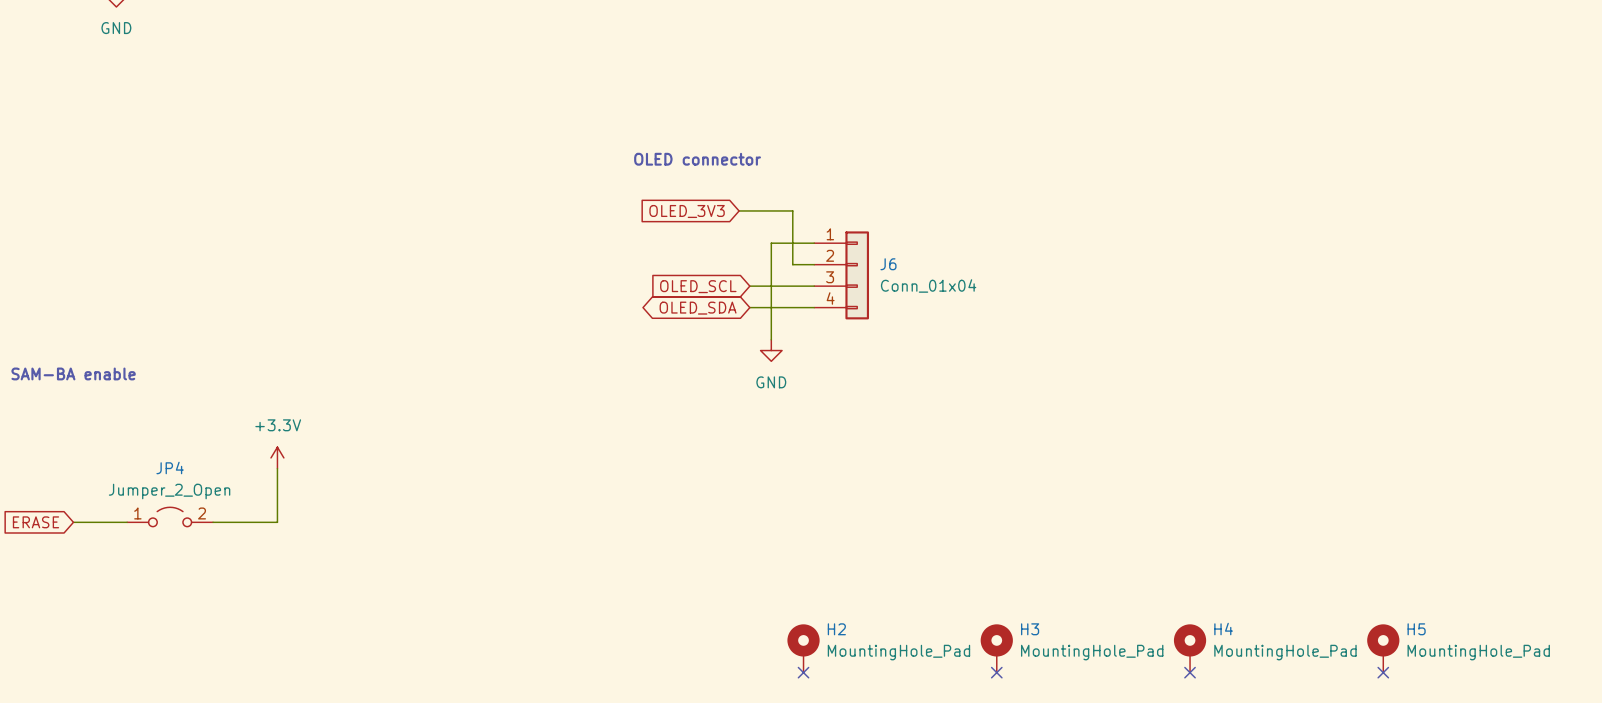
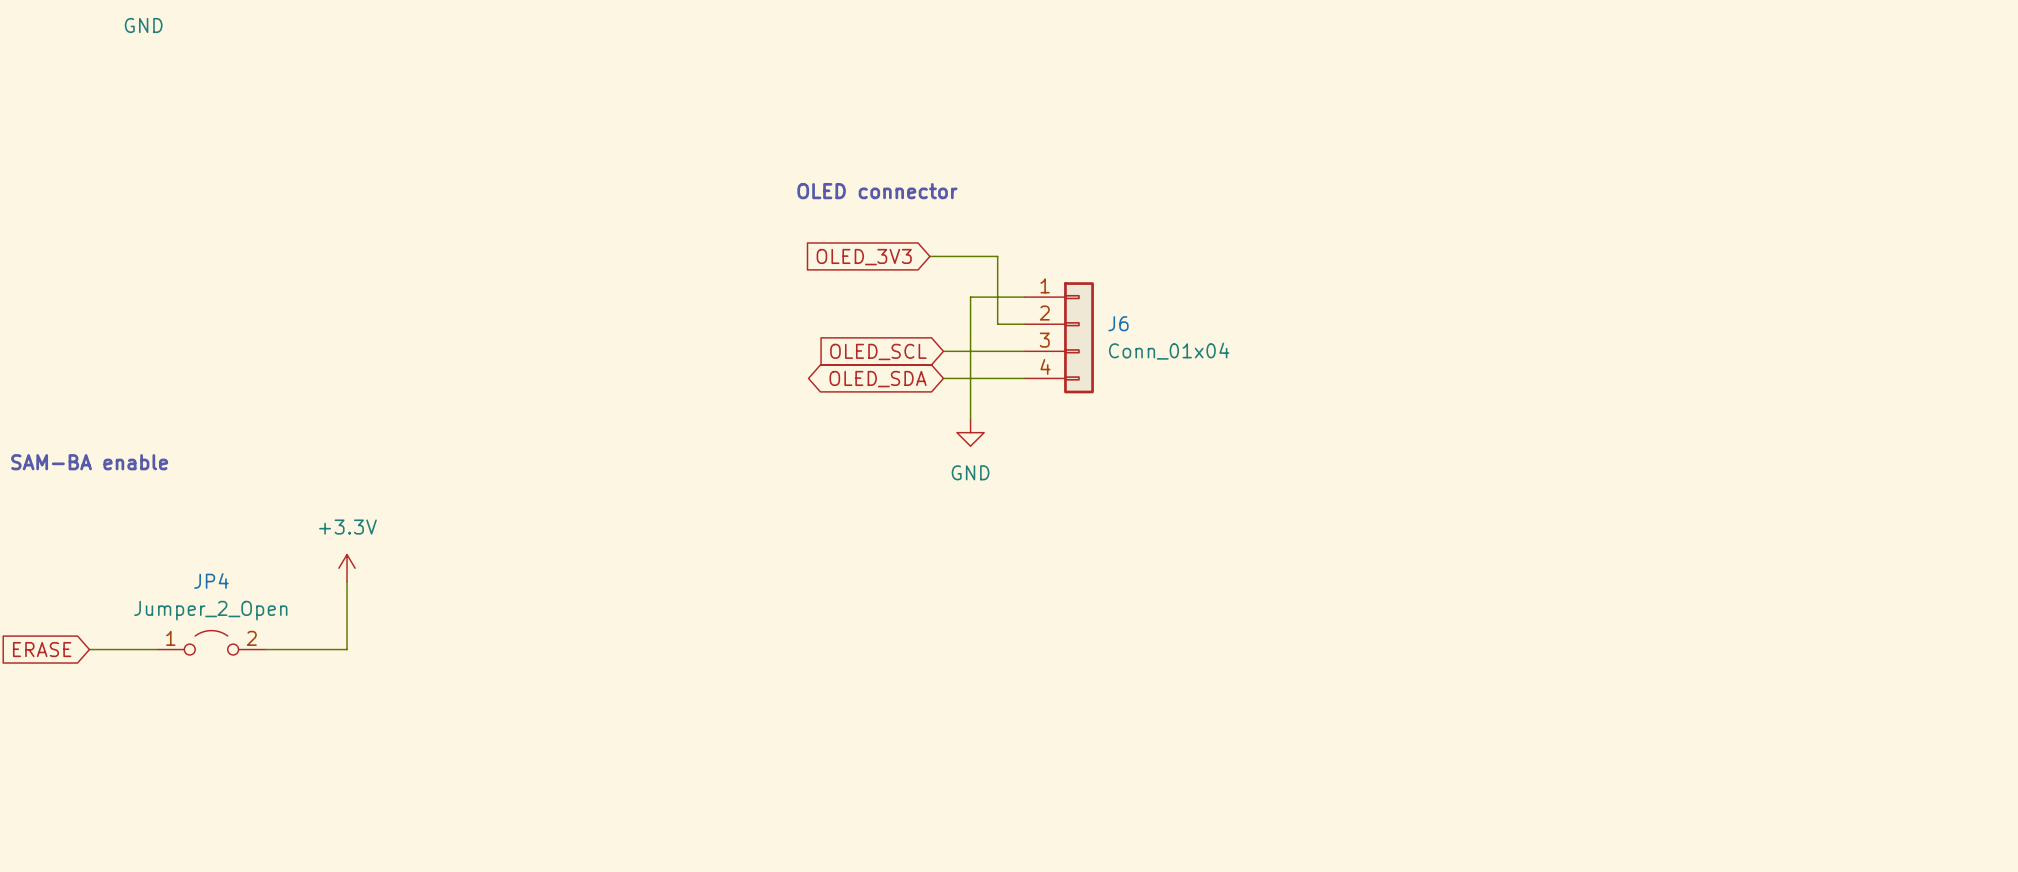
H2: MountingHole_Pad (803, 648) -> none
H3: MountingHole_Pad (996, 648) -> none
H4: MountingHole_Pad (1190, 648) -> none
H5: MountingHole_Pad (1383, 648) -> none
no-connect mark: (803, 672) -> none
no-connect mark: (996, 672) -> none
no-connect mark: (1190, 672) -> none
no-connect mark: (1383, 672) -> none

